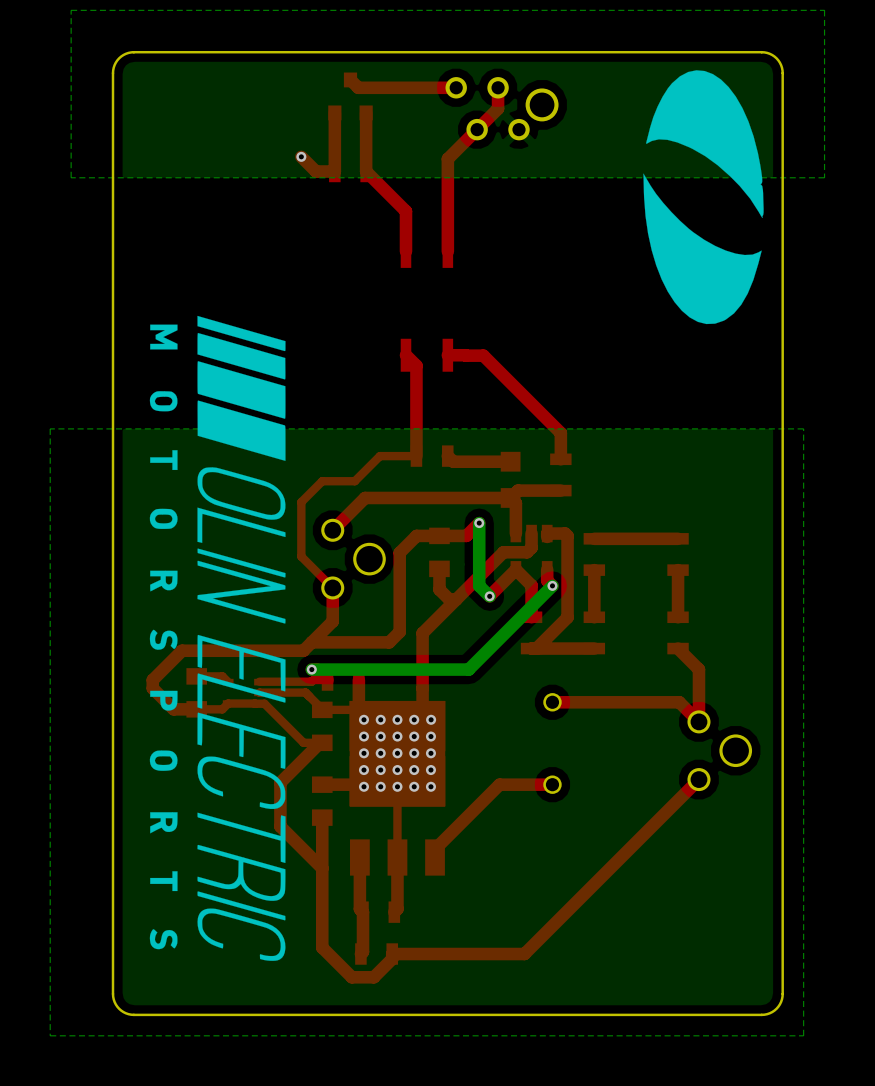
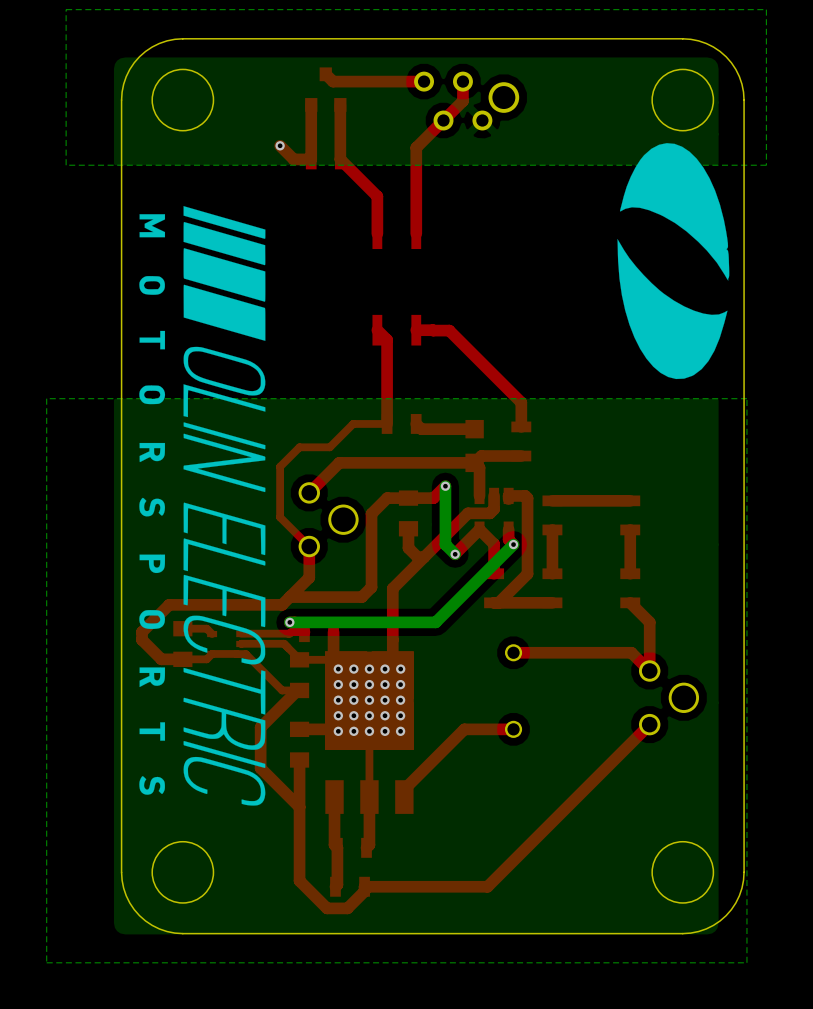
board edge: (761, 52) (133, 52) (123, 55) (115, 62) (113, 73) (113, 993) (115, 1004) (123, 1012) (133, 1014) (761, 1014) (772, 1012) (779, 1004) (782, 993) (782, 73) (781, 65) (776, 58) (769, 53) (761, 52) -> (682, 38) (706, 43) (726, 56) (739, 76) (744, 100) (744, 872) (741, 888) (735, 902) (726, 915) (713, 925) (698, 931) (682, 933) (182, 933) (166, 931) (152, 925) (139, 915) (129, 902) (123, 888) (121, 872) (121, 100) (123, 84) (129, 69) (139, 56) (152, 47) (166, 40) (182, 38) (682, 38)
round board edge: none -> [151, 68, 215, 132]
round board edge: none -> [651, 68, 715, 132]
drawing position: (703, 197) -> (673, 261)
drawing position: (217, 638) -> (202, 505)
round board edge: none -> [151, 840, 215, 904]
round board edge: none -> [651, 840, 715, 904]

